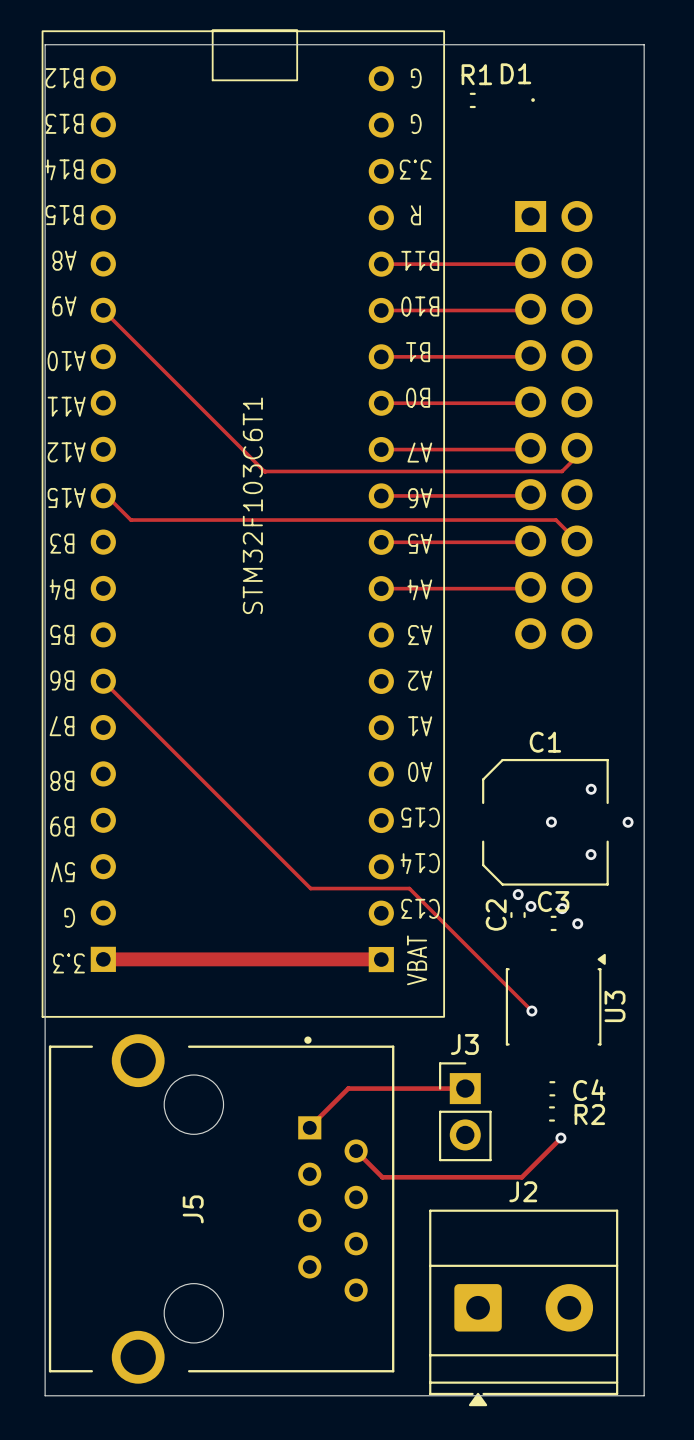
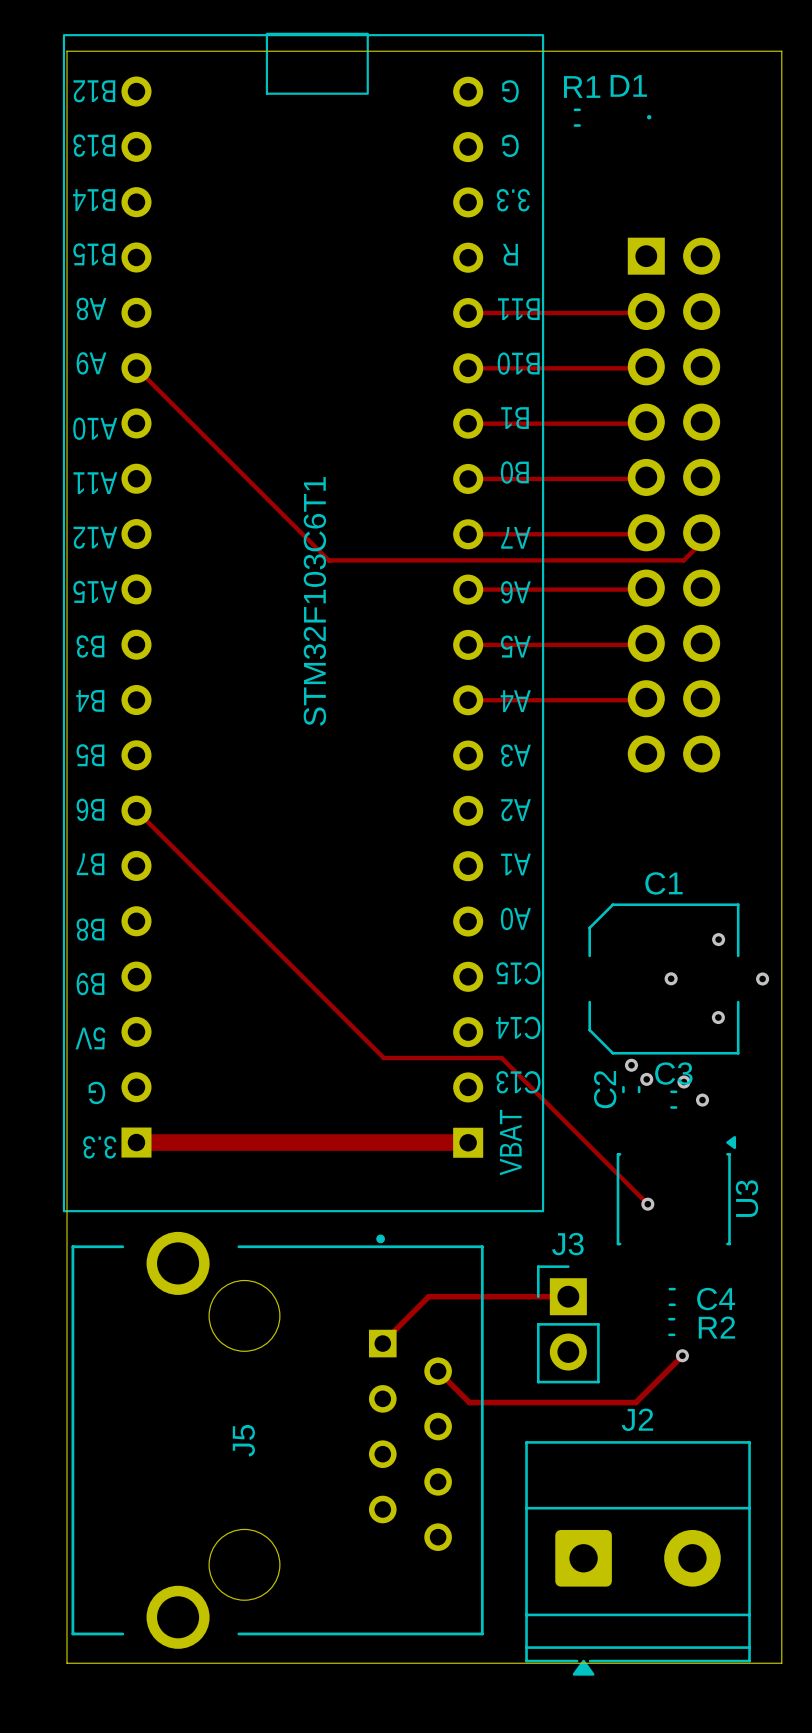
track: (103, 495) (106, 495) (130, 520) (556, 520) (576, 541) -> none

